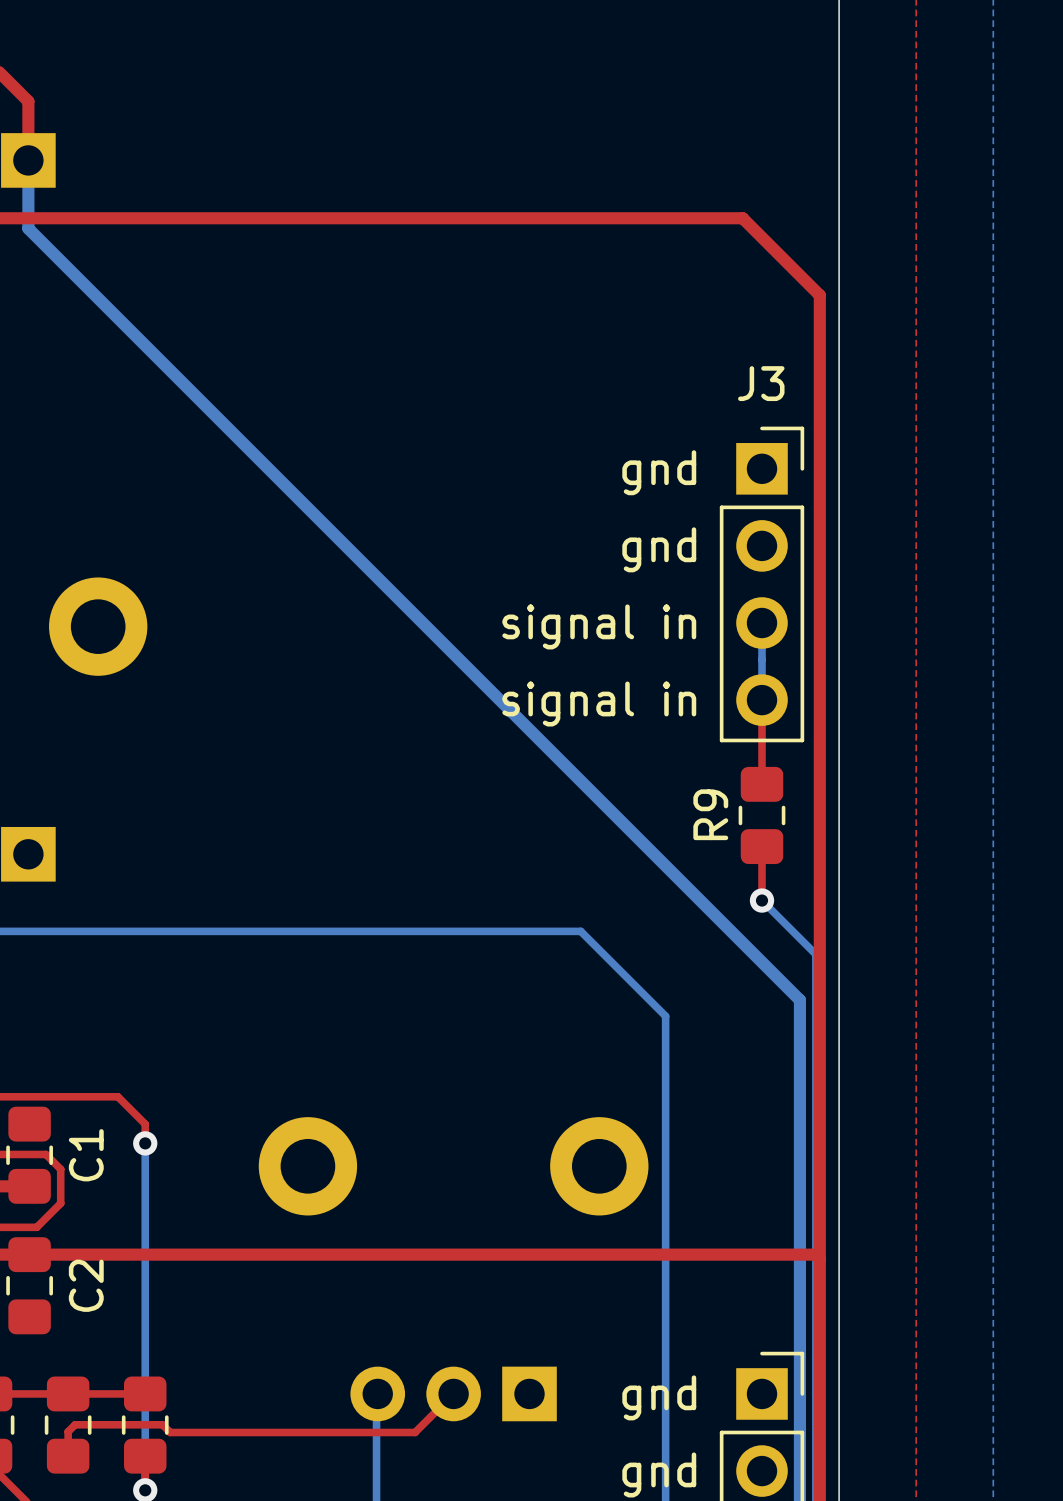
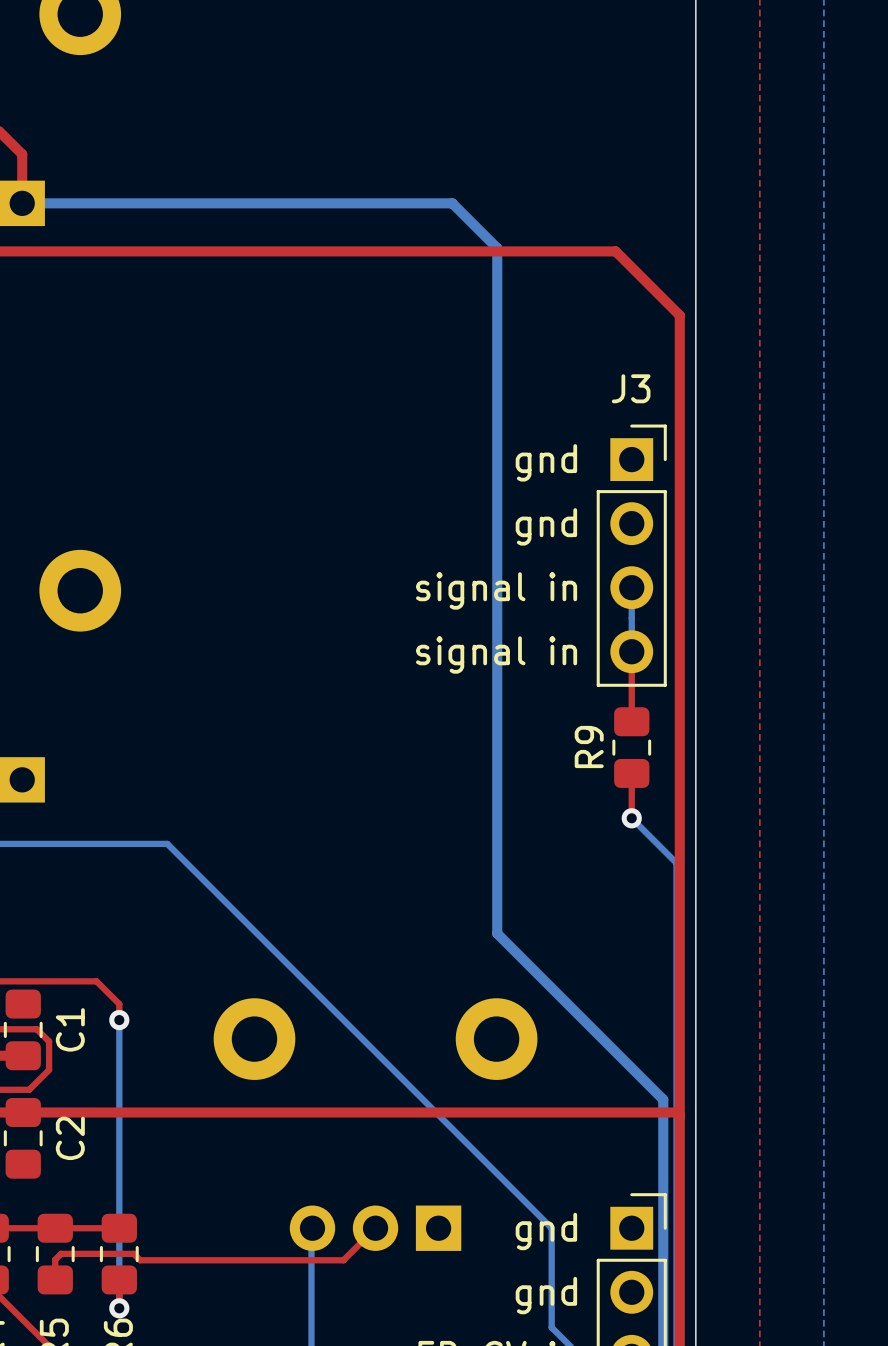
bottom track: (28, 160) (28, 228) (799, 1000) (799, 1239) -> (22, 203) (452, 203) (497, 248) (497, 933) (663, 1099)
bottom track: (203, 931) (580, 931) (665, 1016) (665, 1393) -> (167, 843) (551, 1228)

